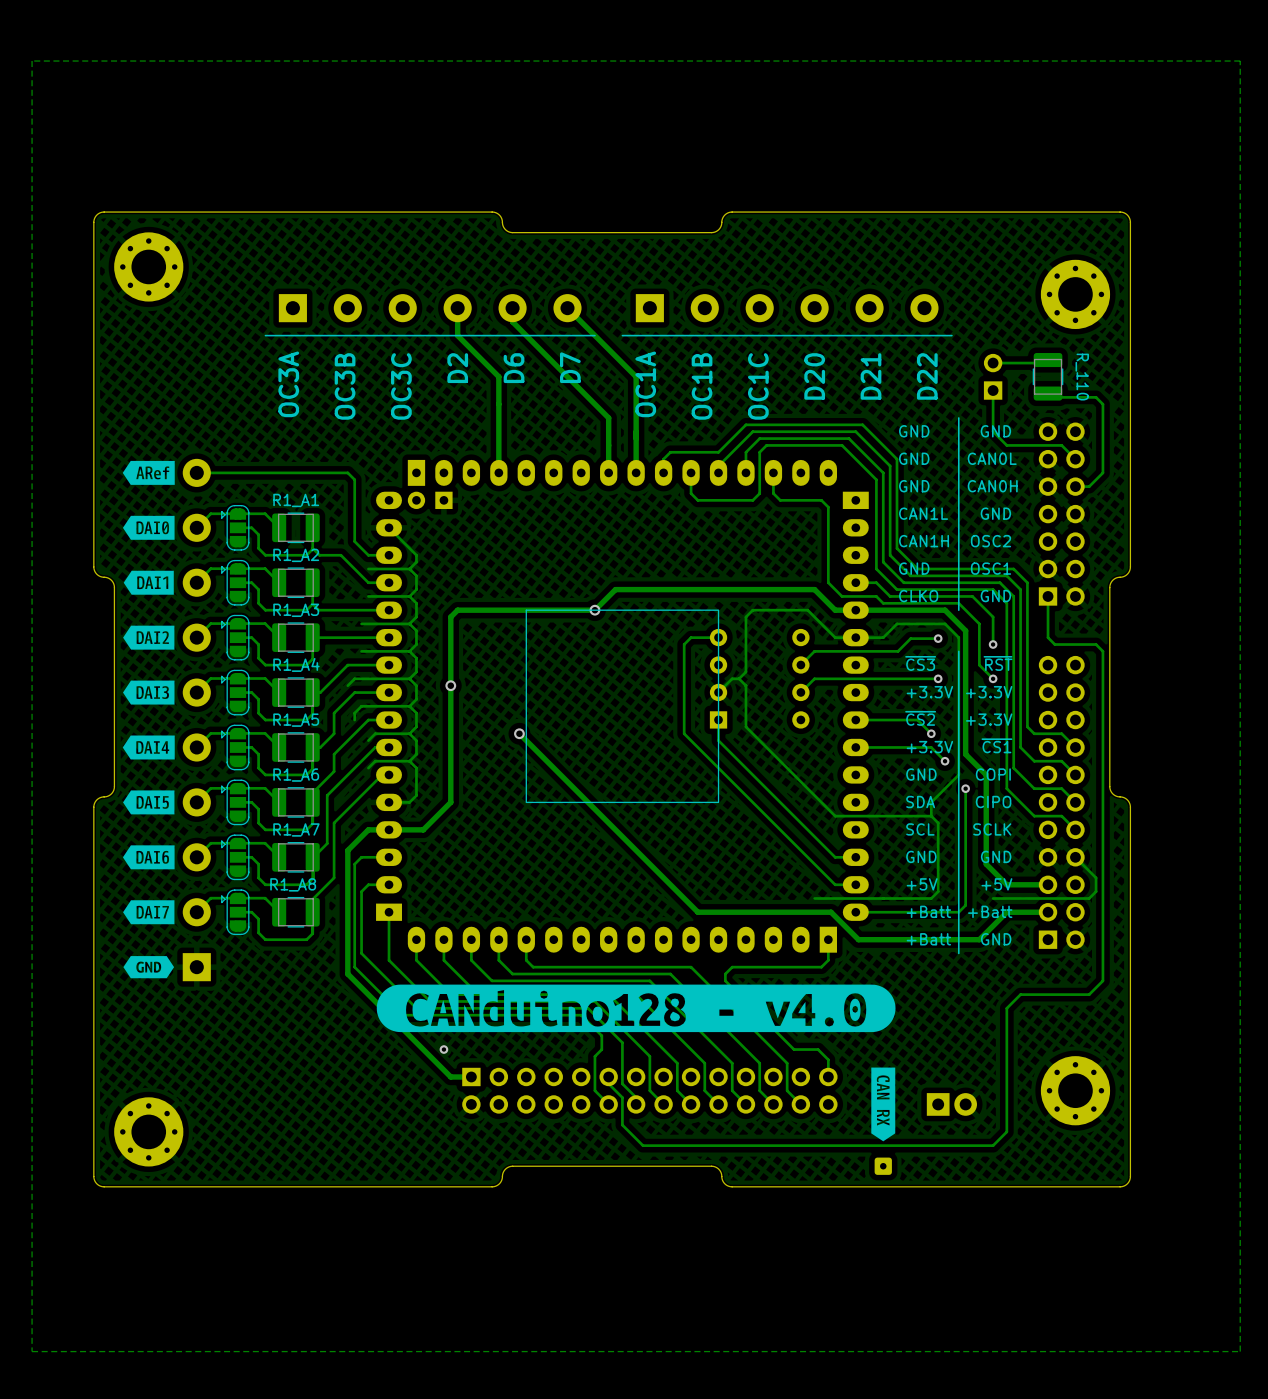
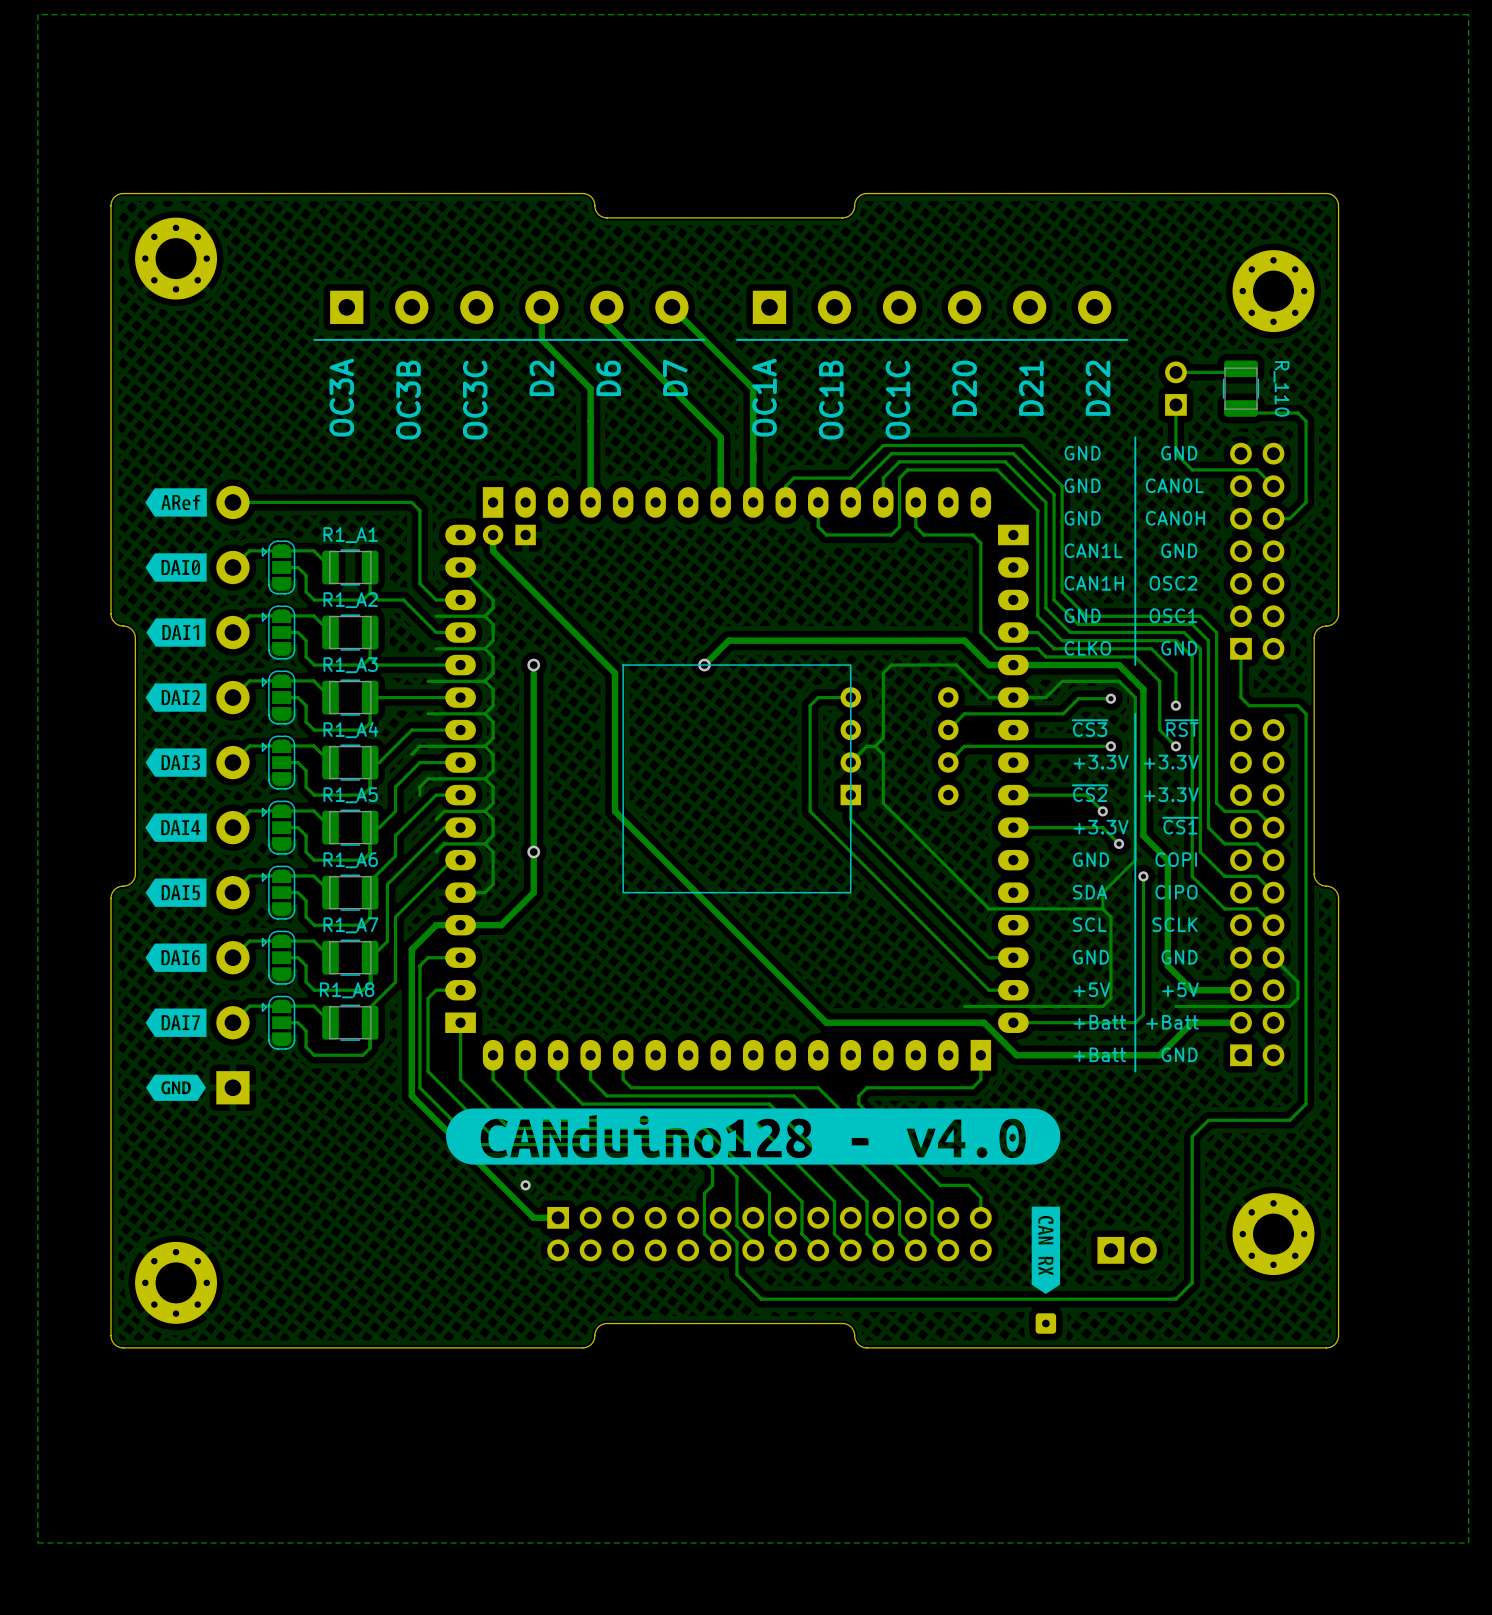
track: none -> (493, 534) (493, 551) (615, 673) (615, 811)
via: none -> (533, 665)
track: (594, 610) (457, 610) (450, 617) (450, 802) -> none
via: (450, 685) -> none
via: (519, 733) -> none
via: none -> (533, 852)

